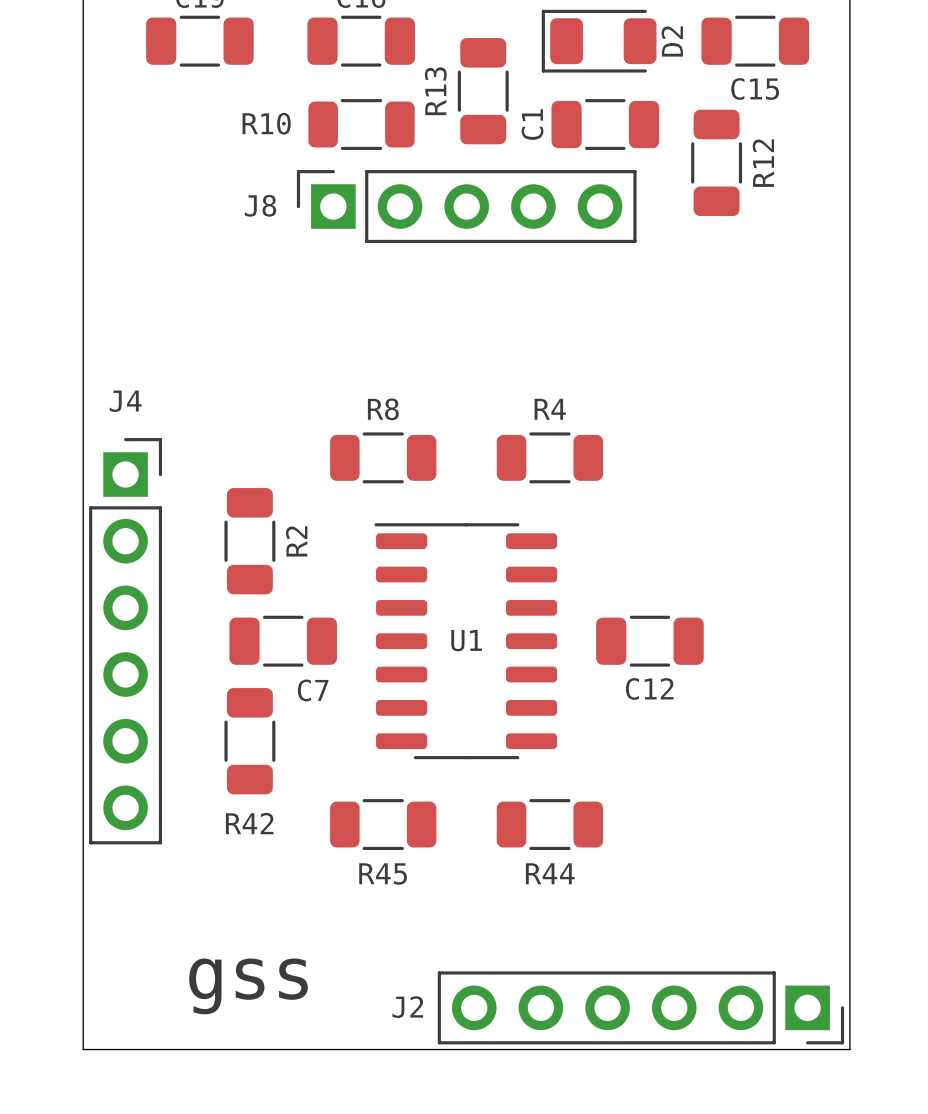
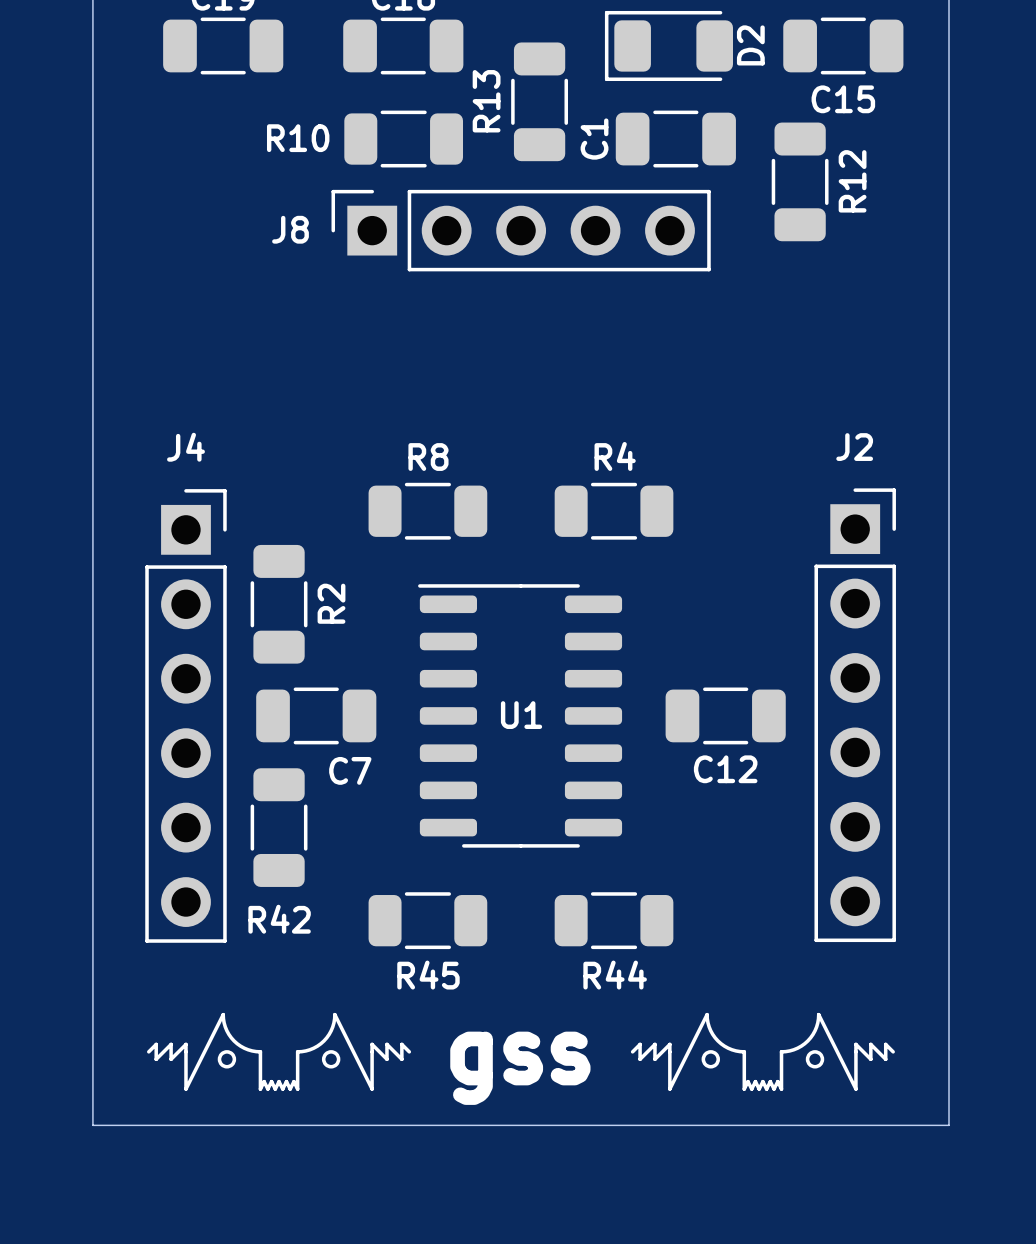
J4 position: (125, 641) -> (185, 715)
drawing: none -> [147, 1012, 412, 1091]
drawing: none -> [630, 1012, 895, 1091]
text position: gss (248, 986) -> gss (520, 1068)
board edge: (83, 1007) (83, 1049) (849, 1049) (849, 1007) -> (92, 1125) (949, 1125)
J2 name position: J2 (407, 1007) -> J2 (854, 447)
J2 rotation: 0° (640, 1007) -> 90° counterclockwise (855, 715)
J2 position: (640, 1007) -> (855, 715)

